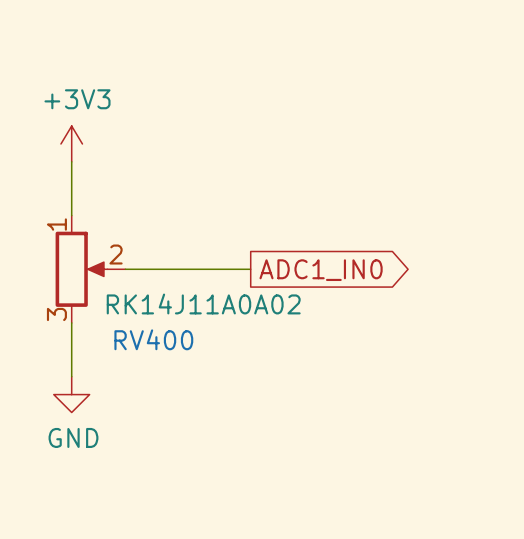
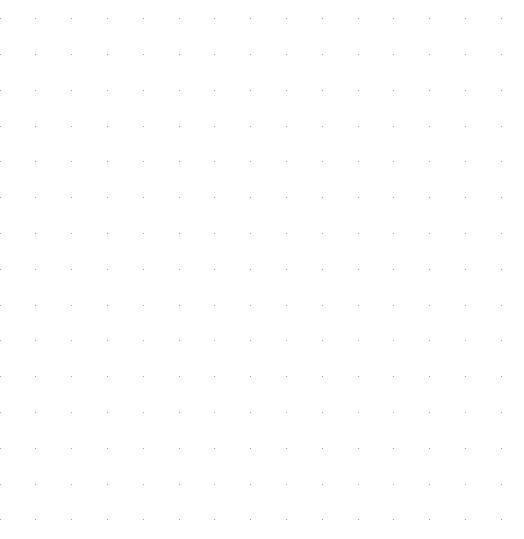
power symbol: +3V3 (71, 143) -> none
wire: (71, 161) (71, 215) -> none
RV400: RK14J11A0A02 (90, 269) -> none
wire: (125, 269) (250, 269) -> none
global label: ADC1_IN0 (321, 270) -> none
wire: (71, 322) (71, 376) -> none
power symbol: GND (71, 394) -> none

